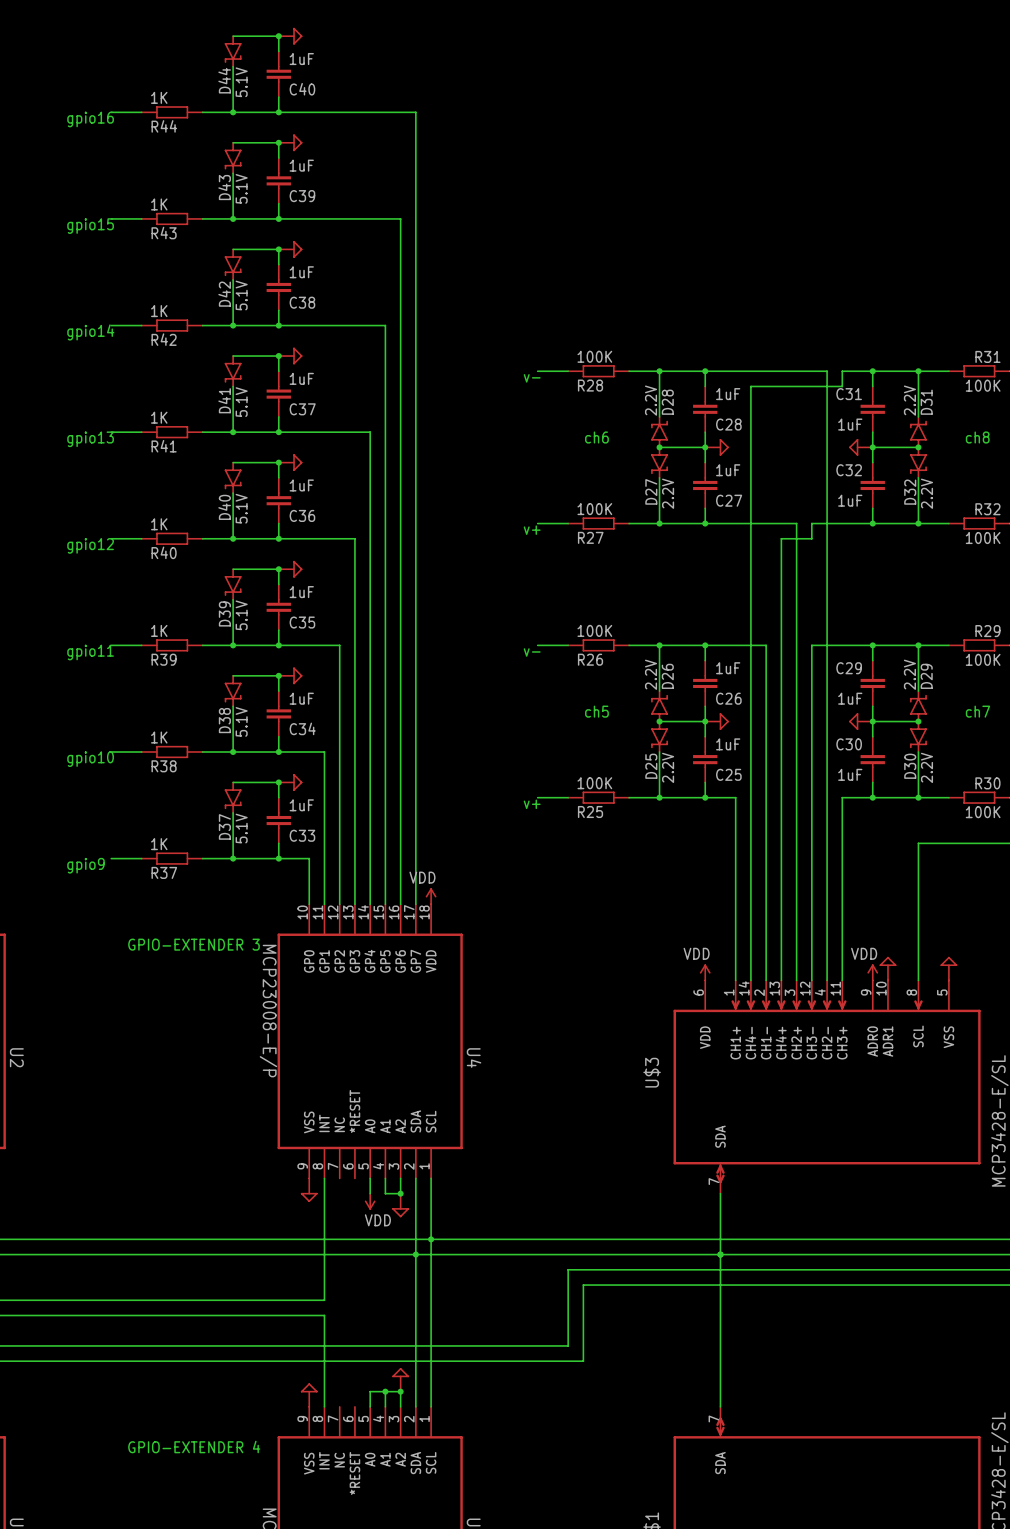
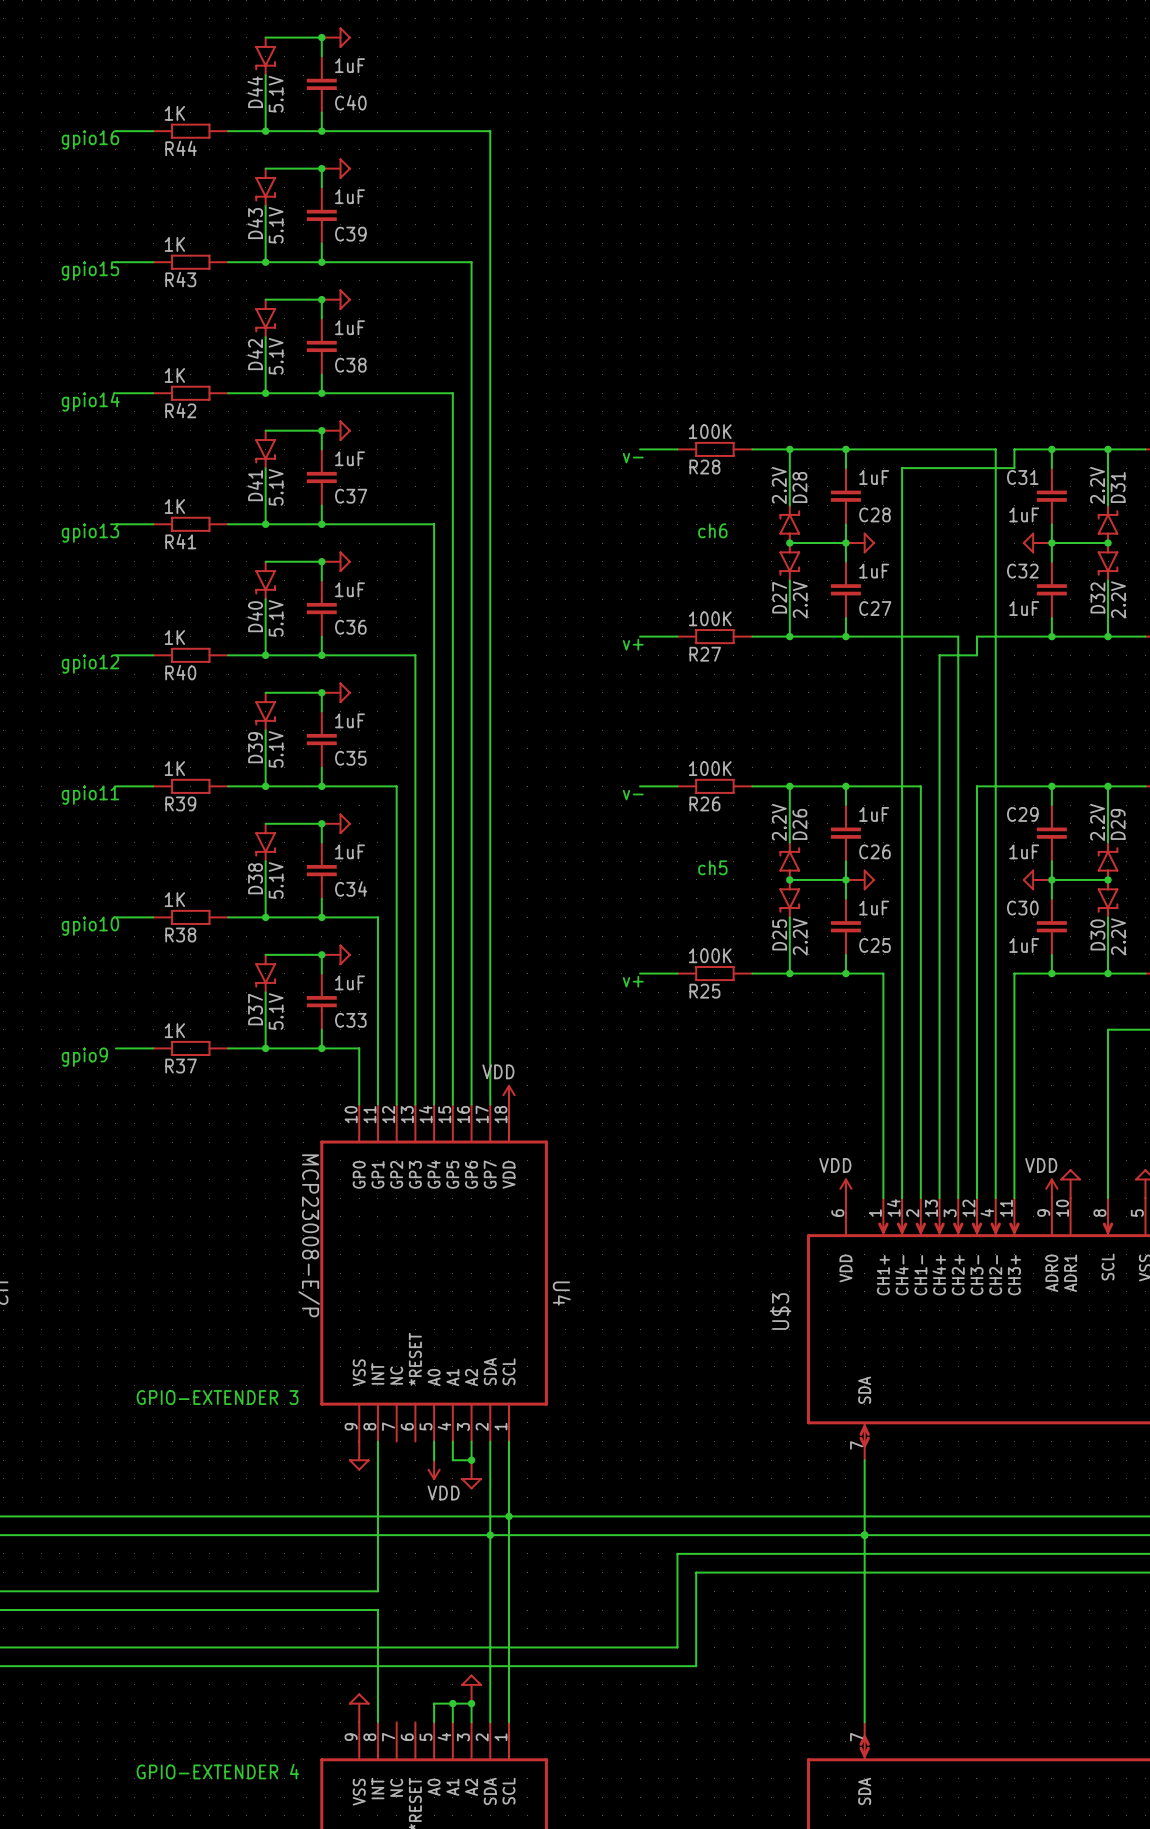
text: GPIO-EXTENDER 3 (193, 944) -> none
text: none -> GPIO-EXTENDER 3 (217, 1397)

